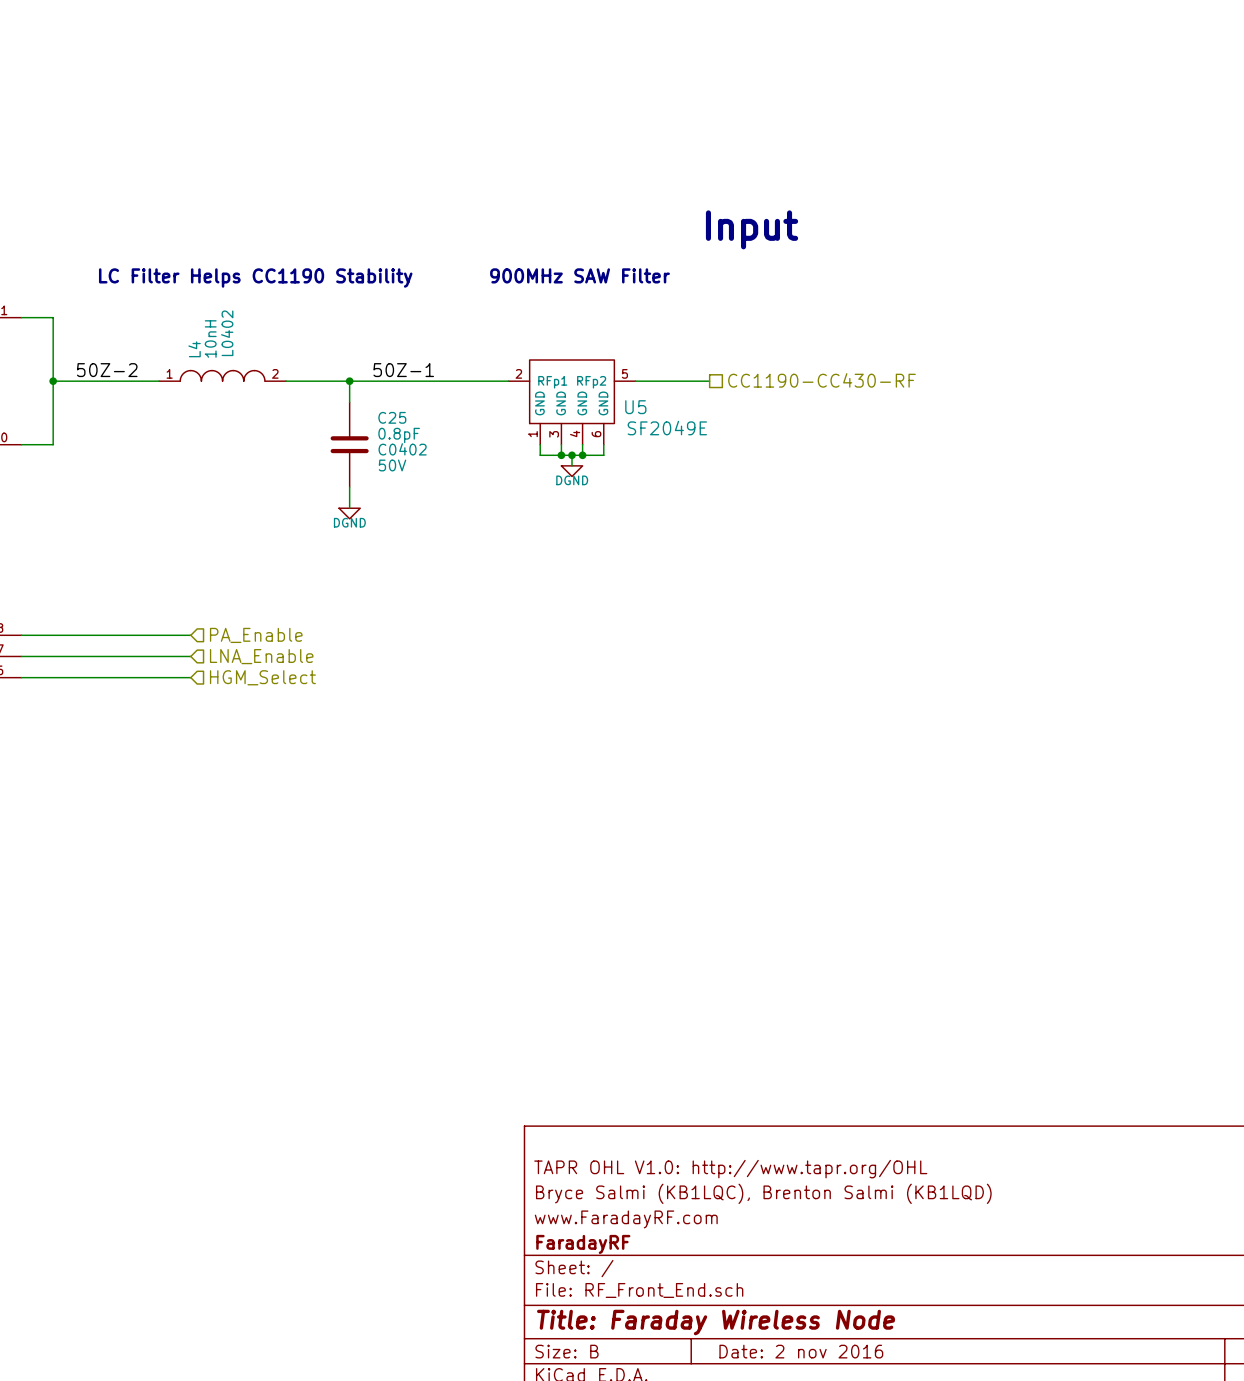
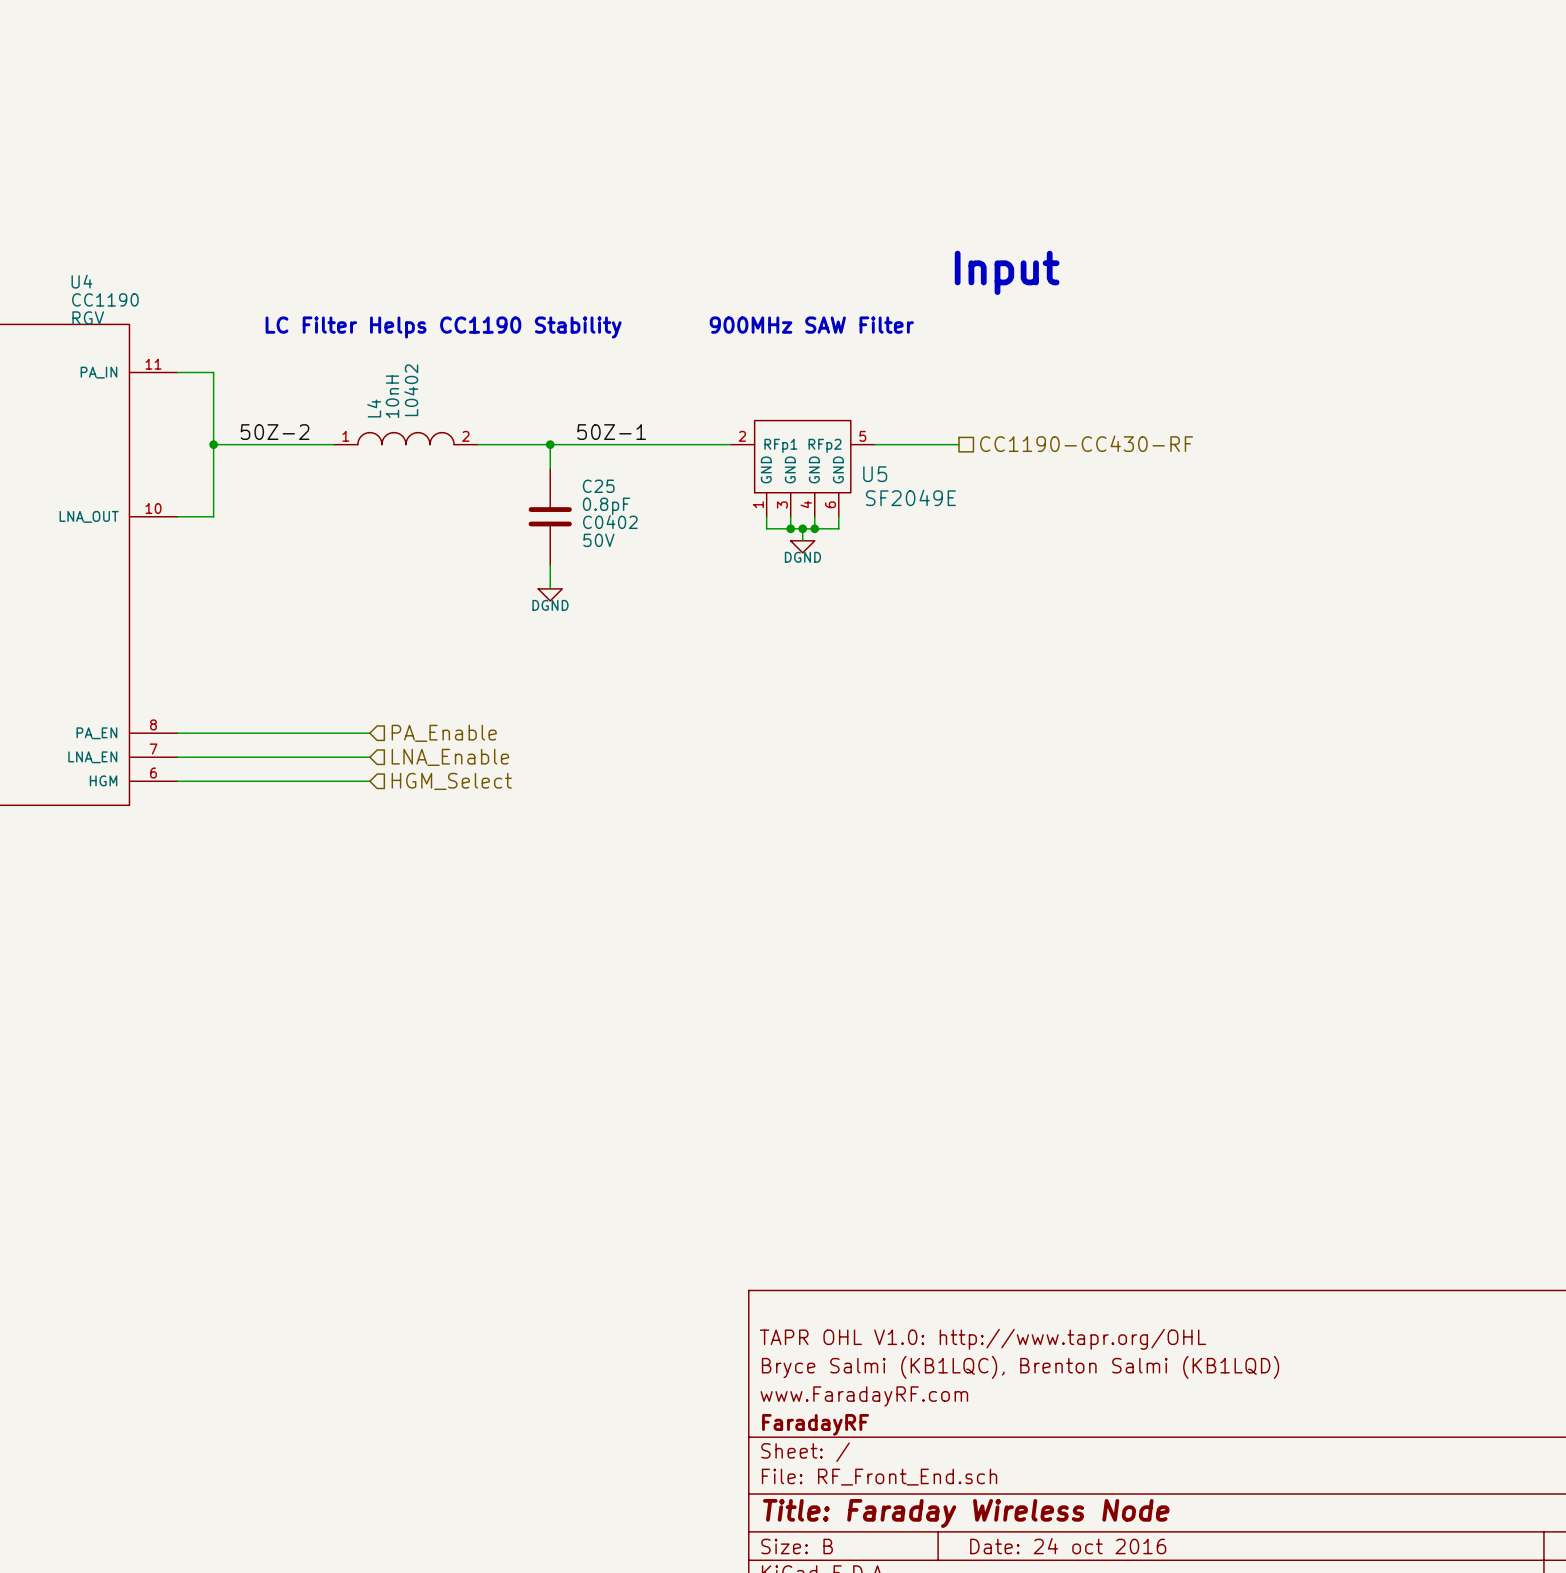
title block: Date: 2 nov 2016 (801, 1351) -> Date: 24 oct 2016 (1068, 1546)

